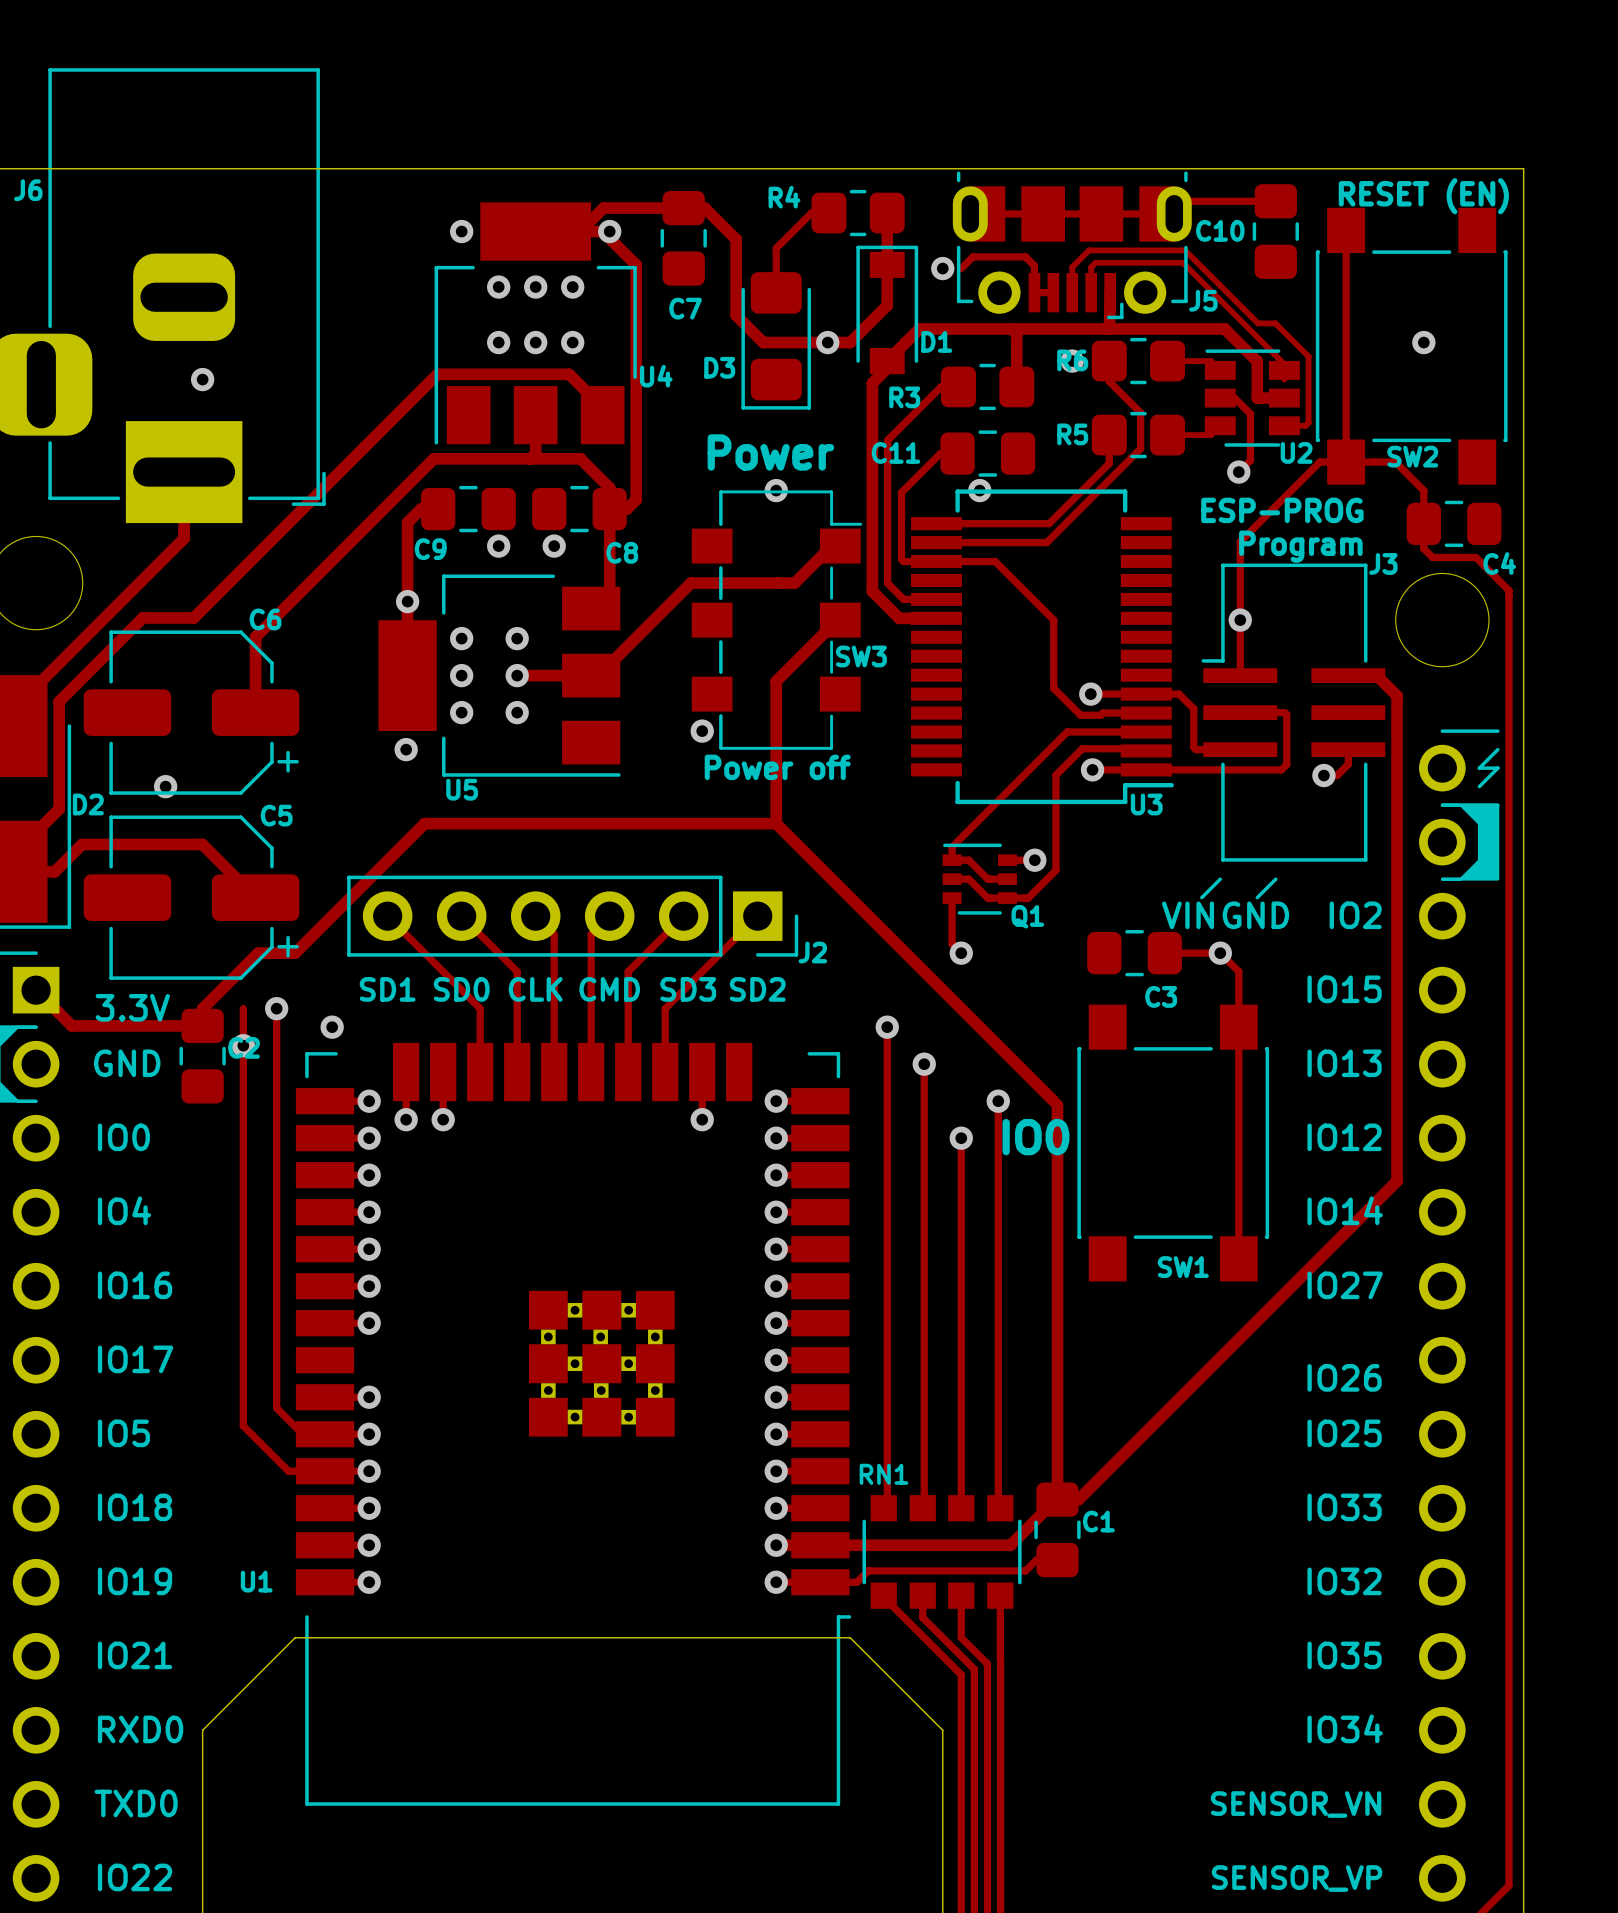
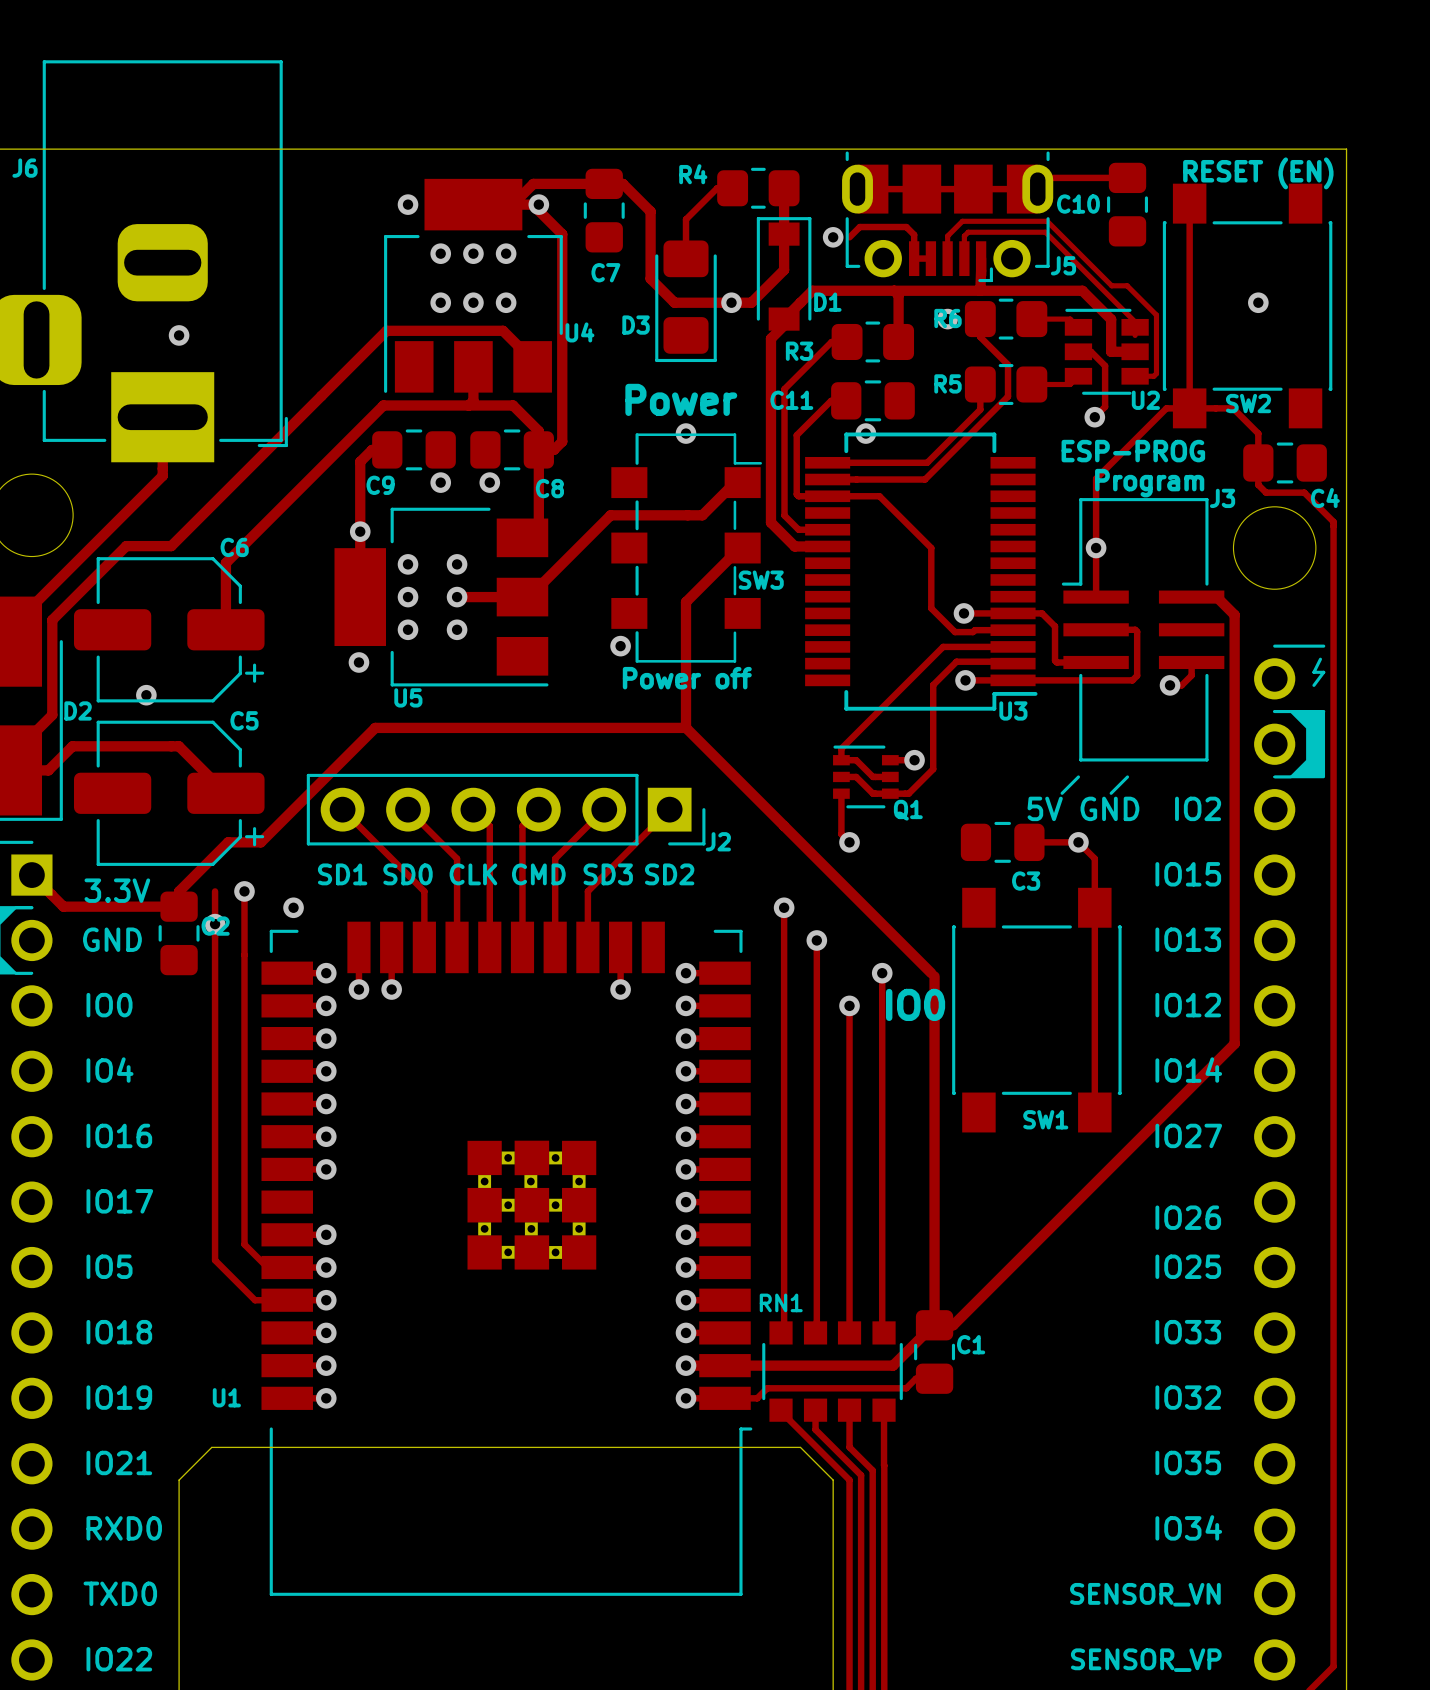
line: none -> (1320, 659) (1313, 672) (1323, 672) (1313, 685)
line: (1497, 749) (1479, 768) (1497, 768) (1479, 786) -> none
text: VIN (1188, 915) -> 5V (1045, 808)
board edge: (295, 1637) (202, 1730) -> (260, 1447) (211, 1447) (179, 1480) (179, 1529)
board edge: (850, 1637) (942, 1730) -> (751, 1447) (800, 1447) (833, 1480) (833, 1529)

